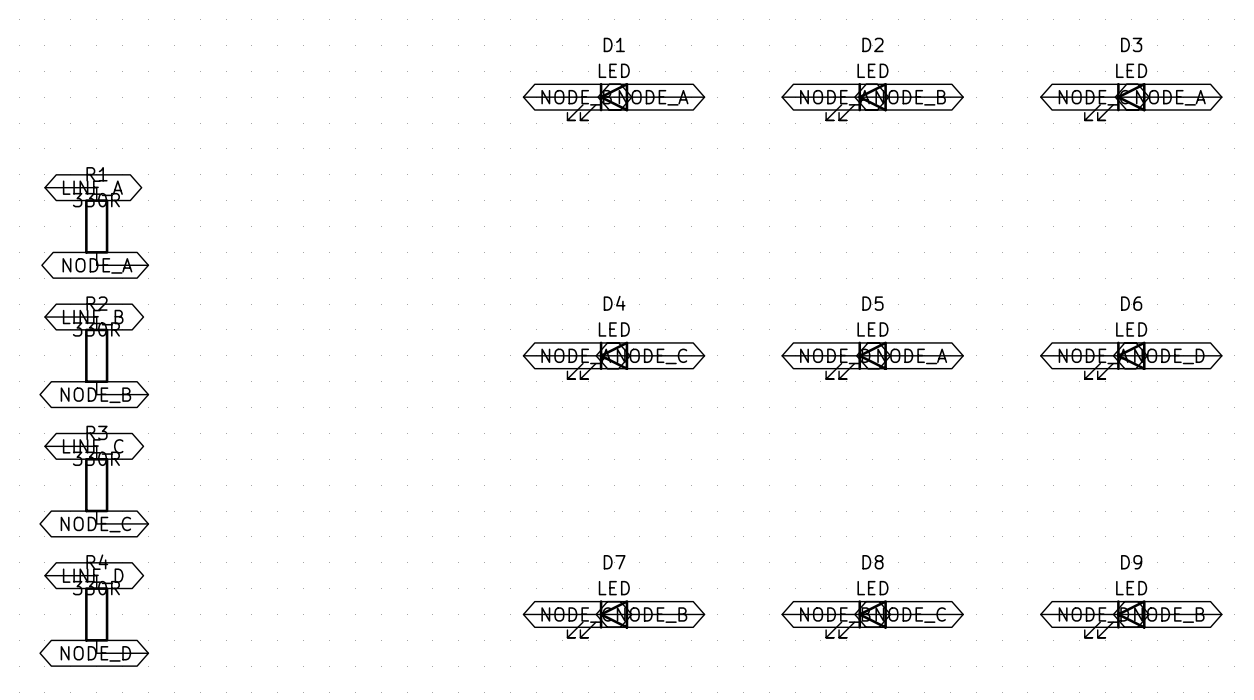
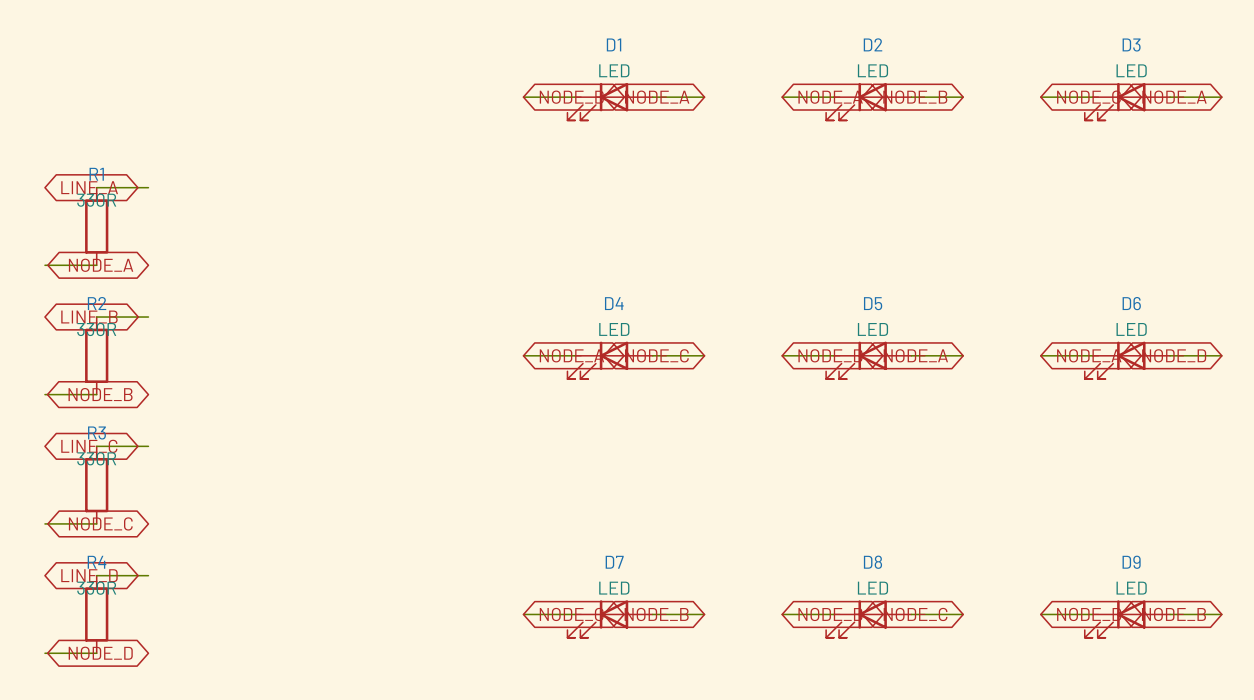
wire: (44, 187) (96, 187) -> (148, 187) (96, 187)
wire: (96, 265) (148, 265) -> (96, 265) (44, 265)
wire: (44, 317) (96, 317) -> (148, 317) (96, 317)
wire: (96, 394) (148, 394) -> (96, 394) (44, 394)
wire: (44, 446) (96, 446) -> (148, 446) (96, 446)
wire: (96, 523) (148, 523) -> (96, 523) (44, 523)
wire: (44, 575) (96, 575) -> (148, 575) (96, 575)
wire: (96, 653) (148, 653) -> (96, 653) (44, 653)

